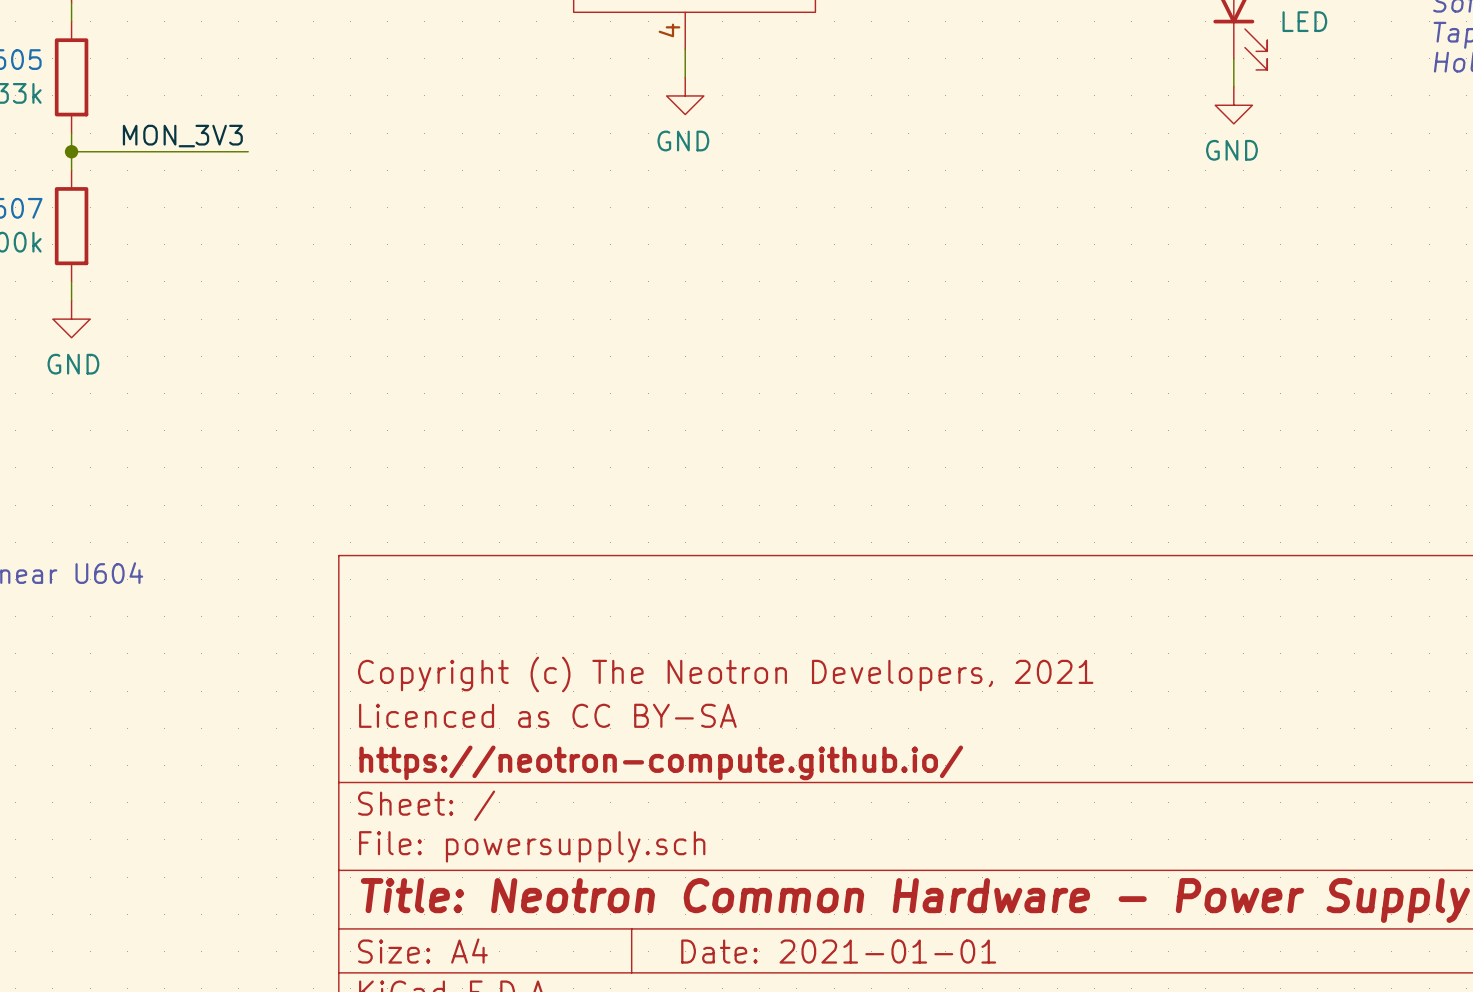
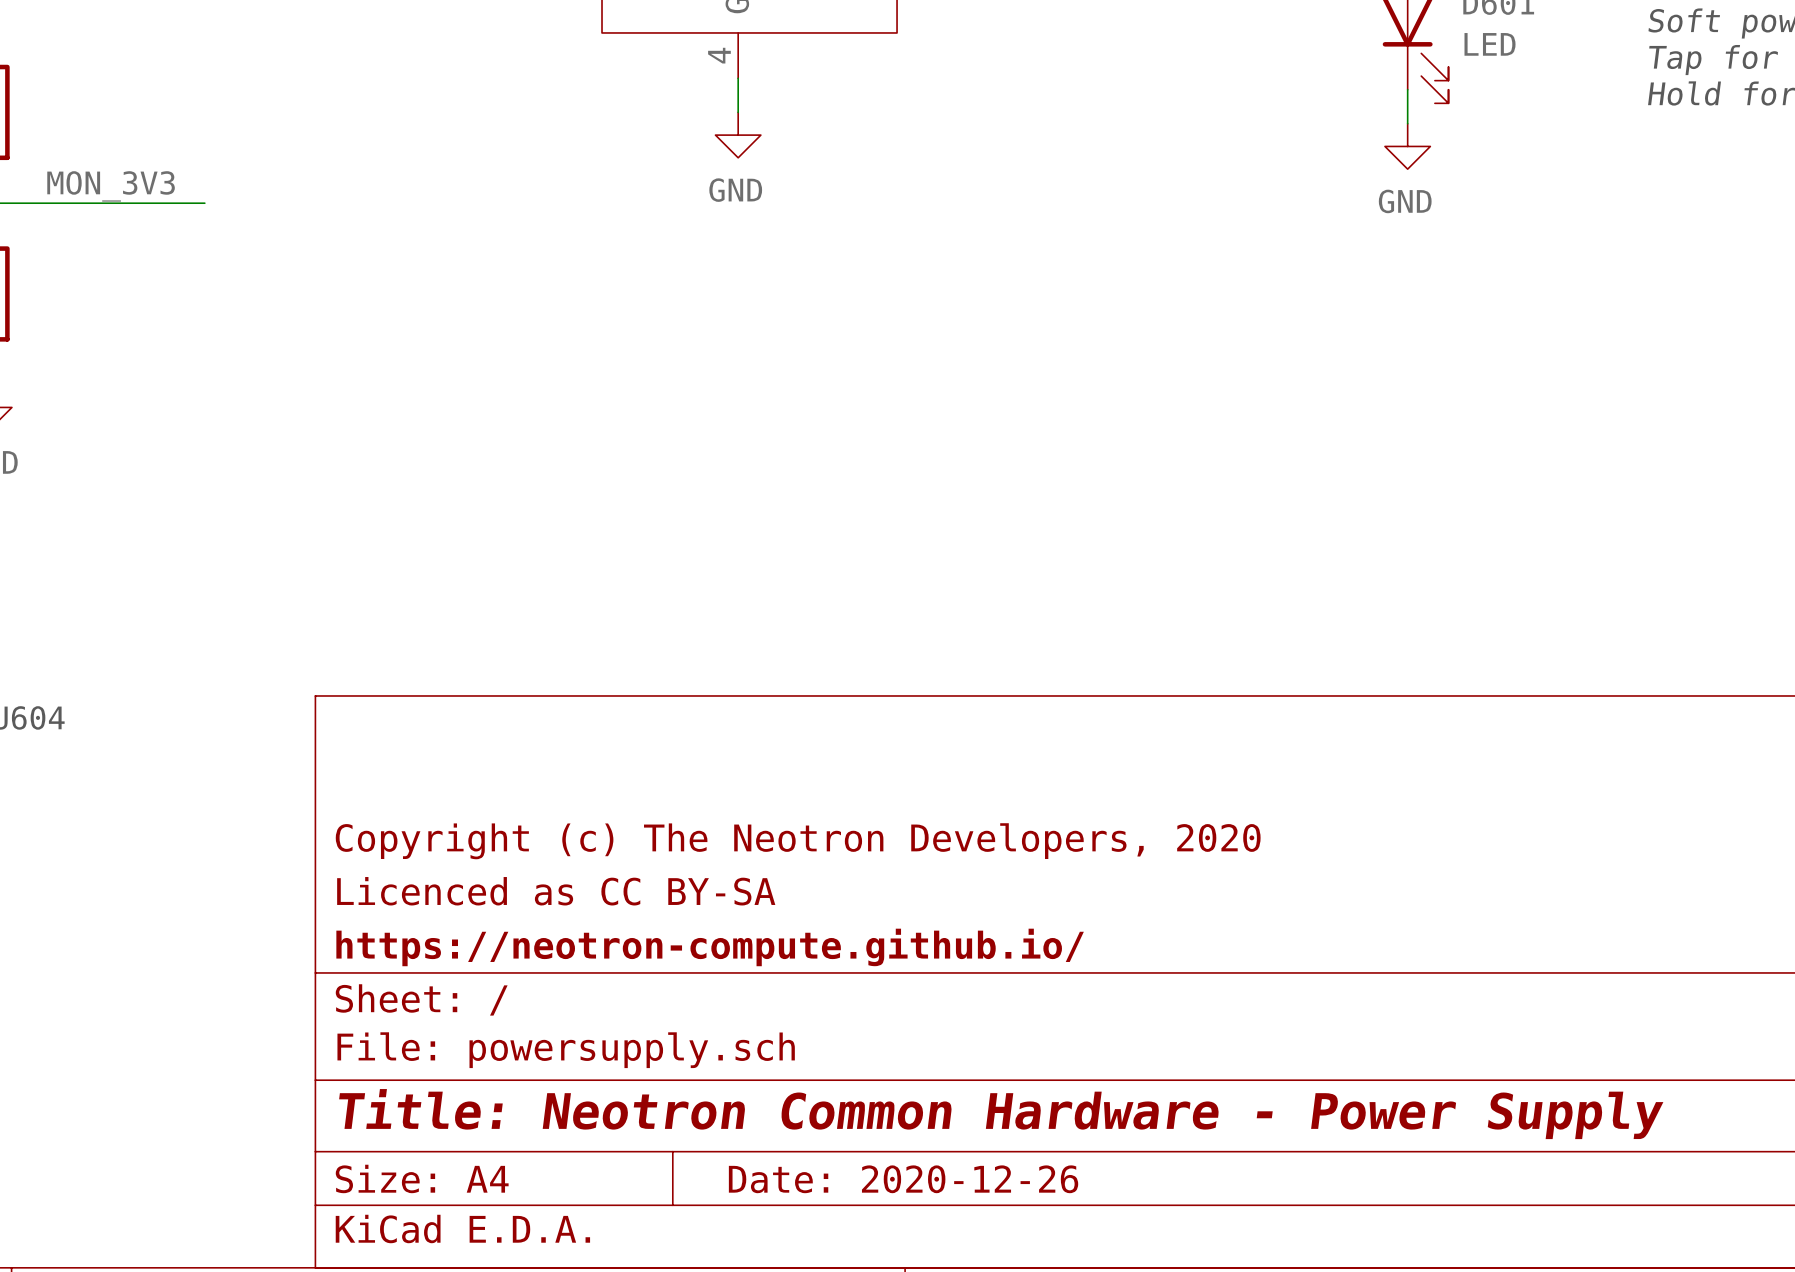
title block: Copyright (c) The Neotron Developers, 2021 (725, 674) -> Copyright (c) The Neotron Developers, 2020 (798, 841)
title block: Date: 2021-01-01 (838, 951) -> Date: 2020-12-26 (903, 1179)

